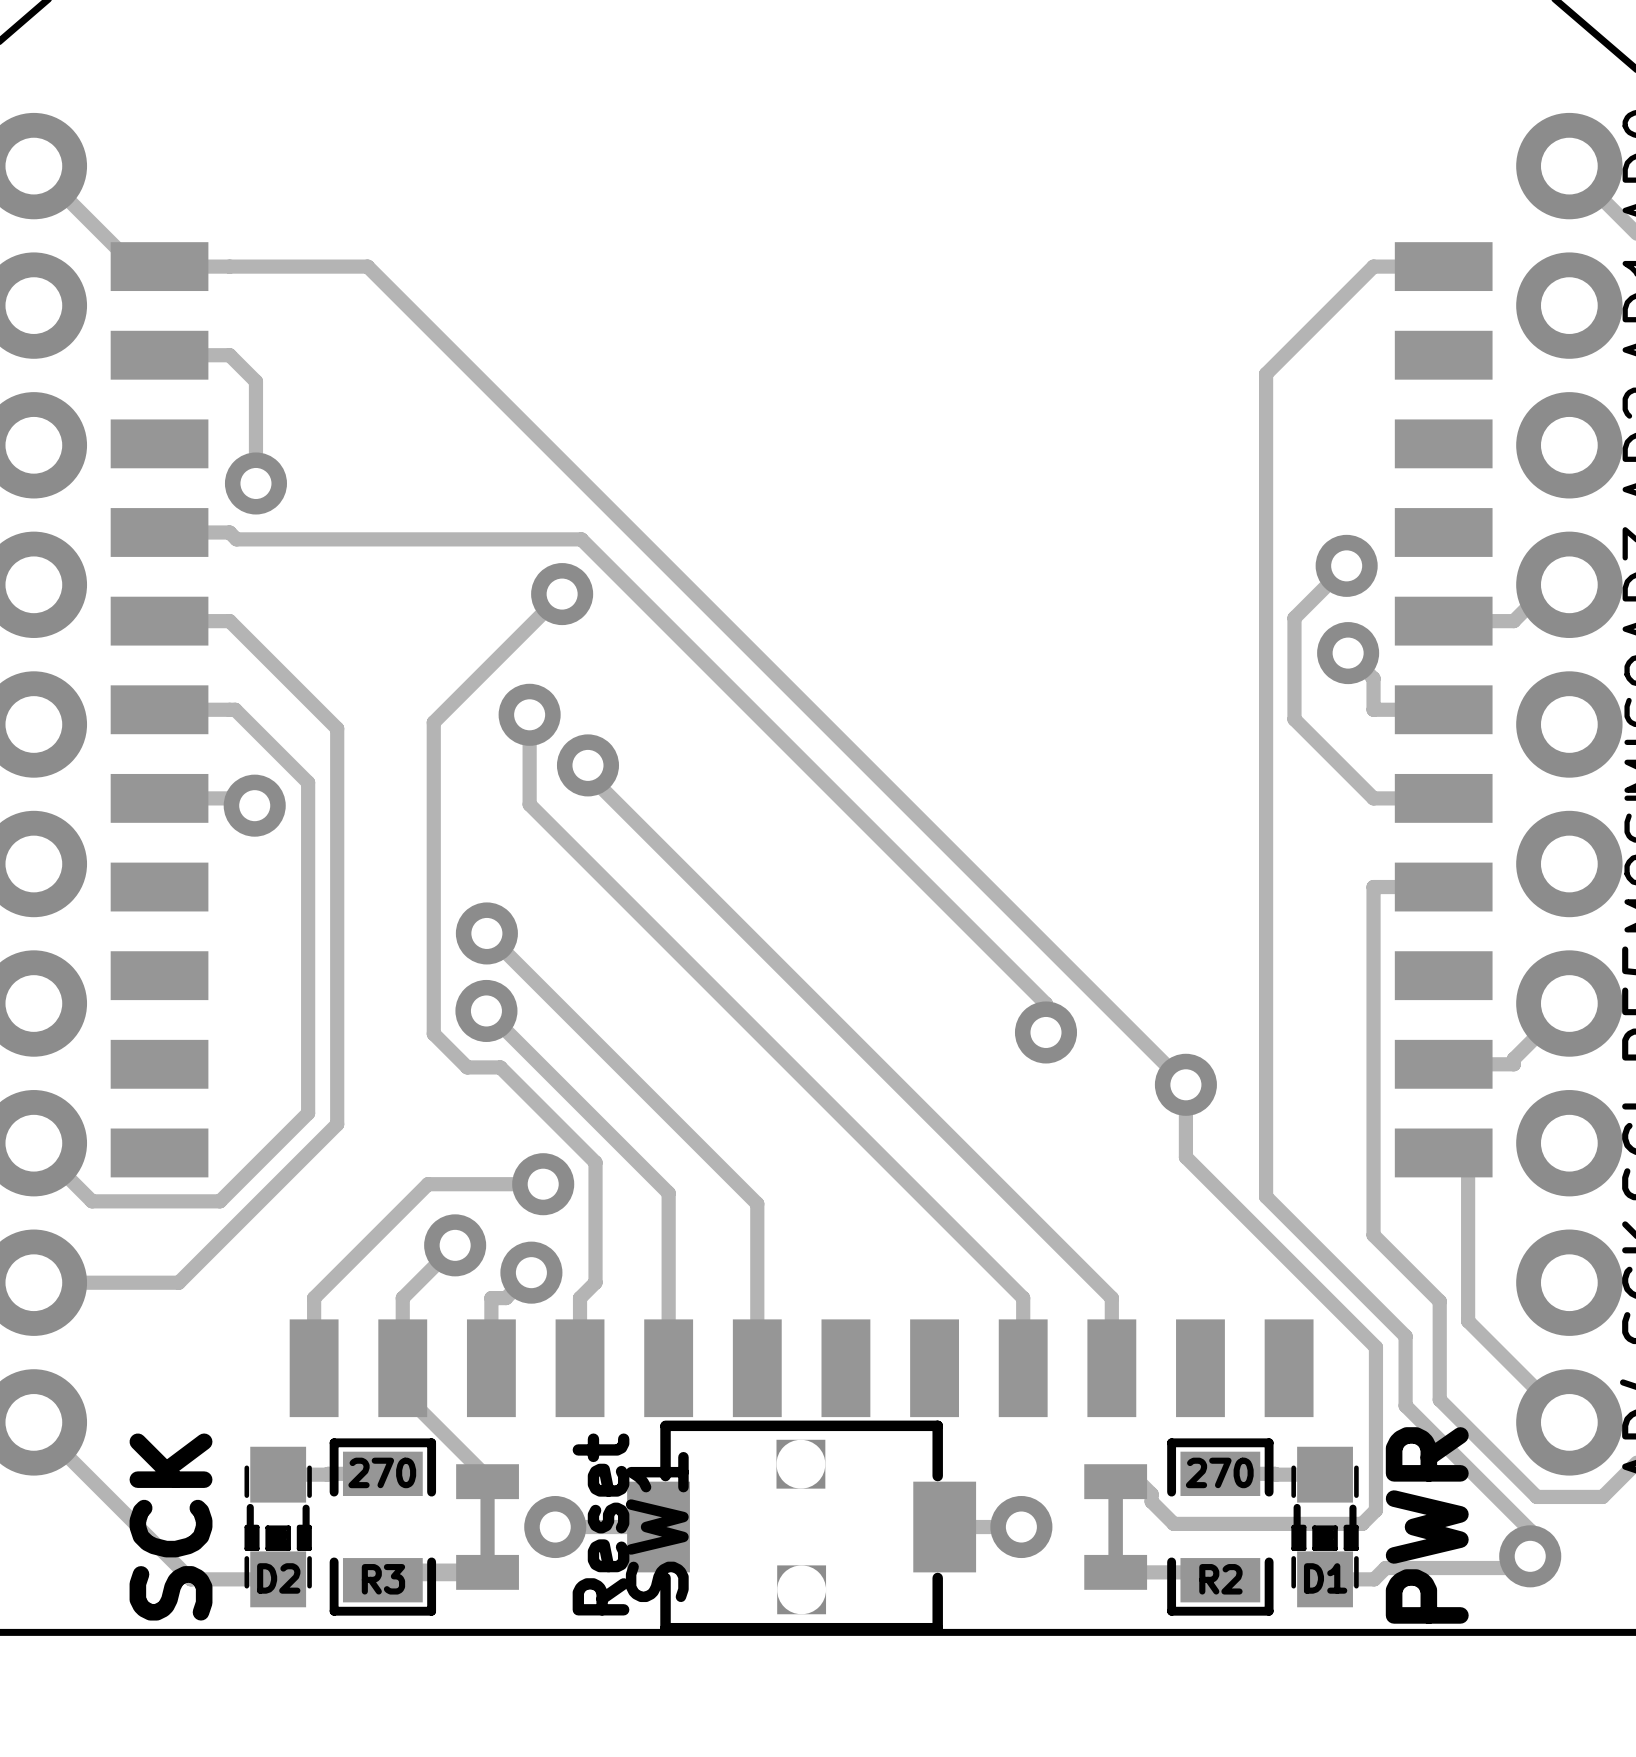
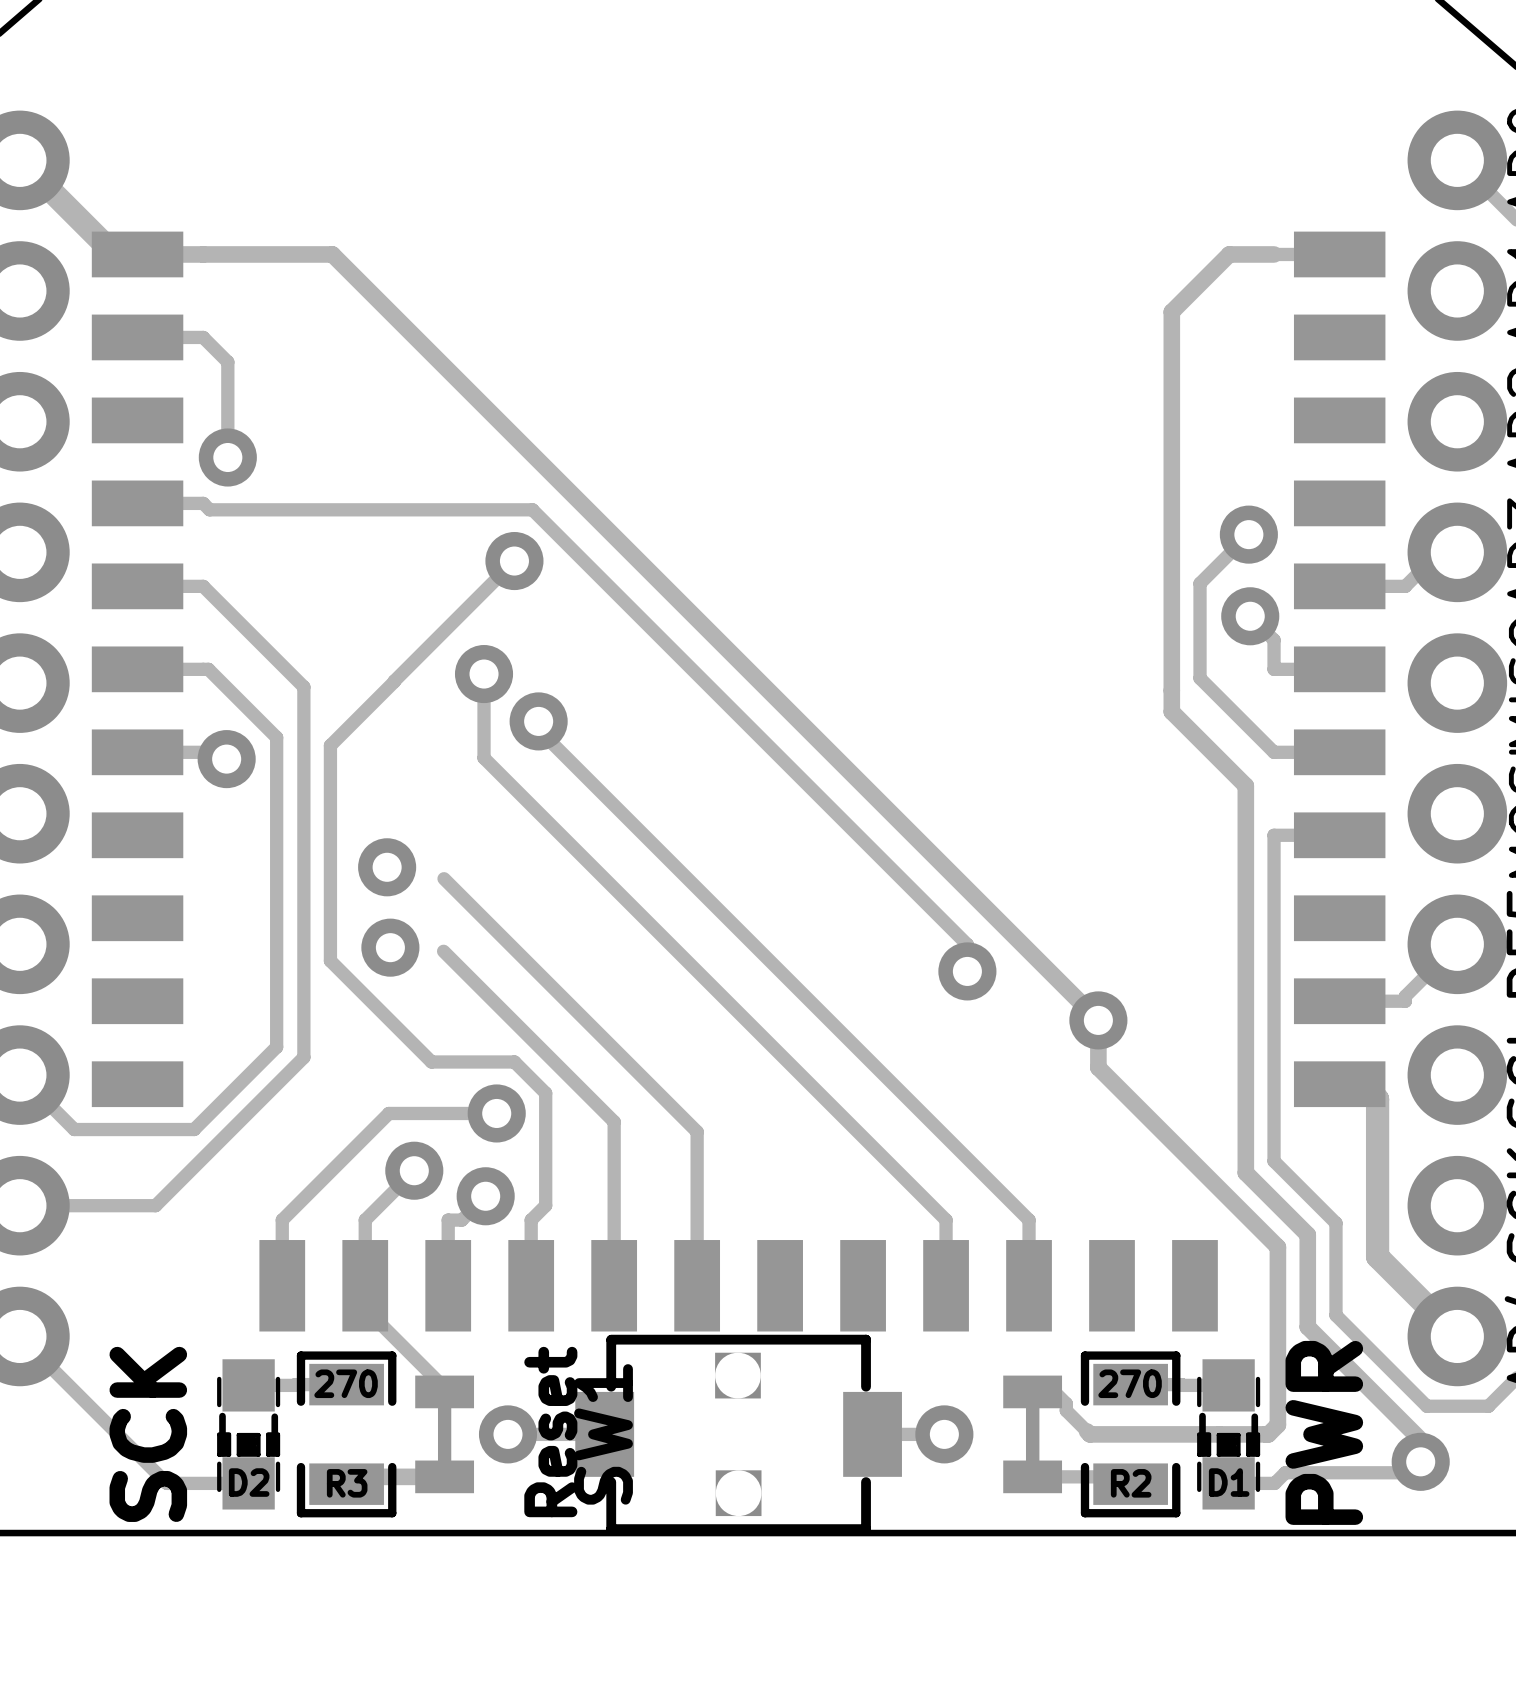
track width: thin (34, 166) (135, 266) (367, 266) (1185, 1084) (1185, 1135) -> thick (20, 160) (114, 254) (332, 254) (1098, 1020) (1098, 1067)
track: (1373, 266) (1266, 374) (1266, 1196) (1405, 1336) (1405, 1405) (1530, 1530) (1530, 1532) -> (1274, 254) (1229, 254) (1171, 311) (1171, 711) (1245, 785) (1245, 1172) (1307, 1234) (1307, 1327) (1420, 1439)
track: (433, 723) (433, 1033) (467, 1067) (500, 1067) (562, 1129) -> (394, 681) (330, 745) (330, 960) (431, 1061) (514, 1061)
via position: (486, 933) -> (387, 867)
via position: (486, 1010) -> (390, 947)
track: (1185, 1135) (1185, 1157) (1375, 1347) (1375, 1510) (1362, 1523) (1173, 1523) -> (1098, 1067) (1277, 1247) (1277, 1424) (1268, 1434) (1090, 1434) (1087, 1431)
track: (1468, 1152) (1468, 1321) (1484, 1337) -> (1362, 1084) (1377, 1099) (1377, 1256)
track width: thin (1468, 1321) (1569, 1422) -> thick (1362, 1241) (1457, 1336)

